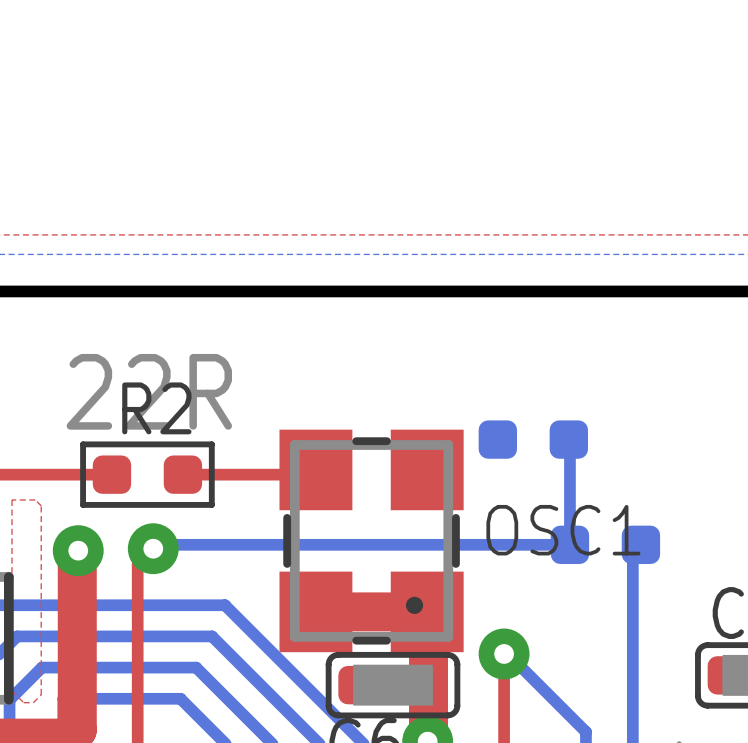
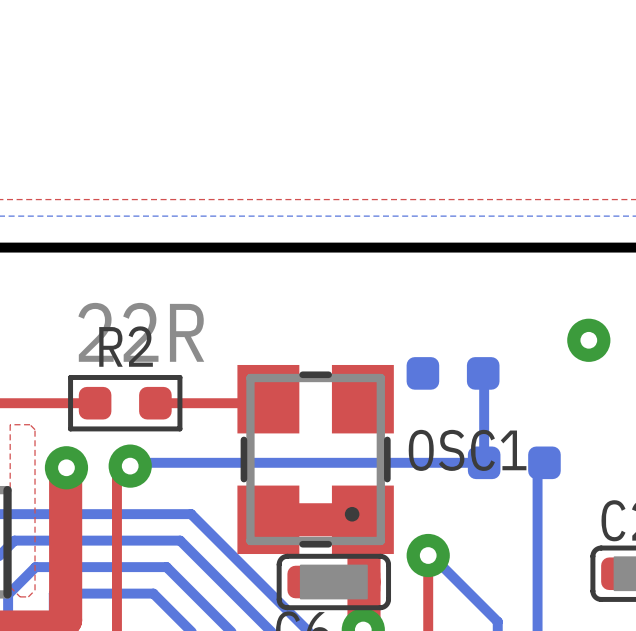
via: none -> (588, 340)

